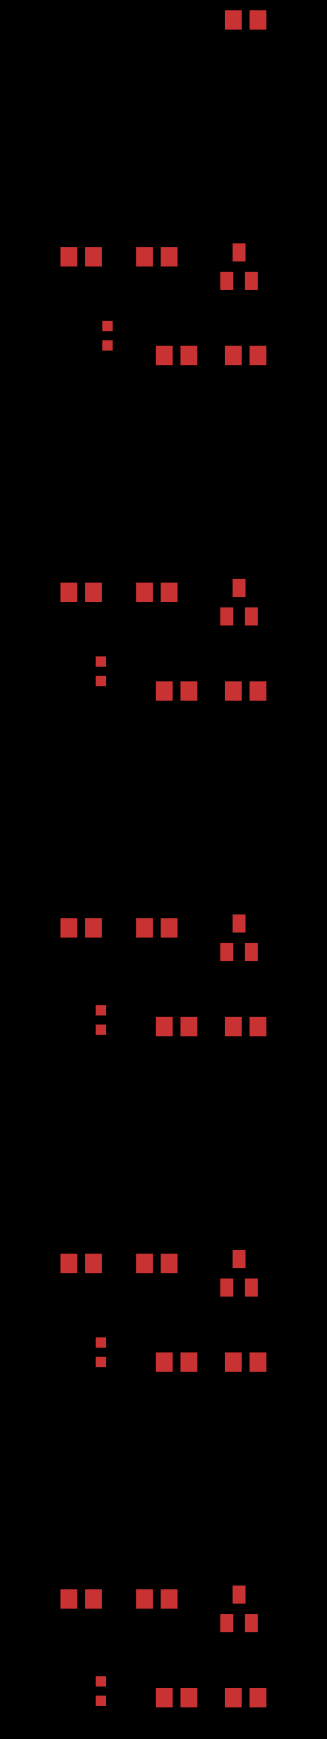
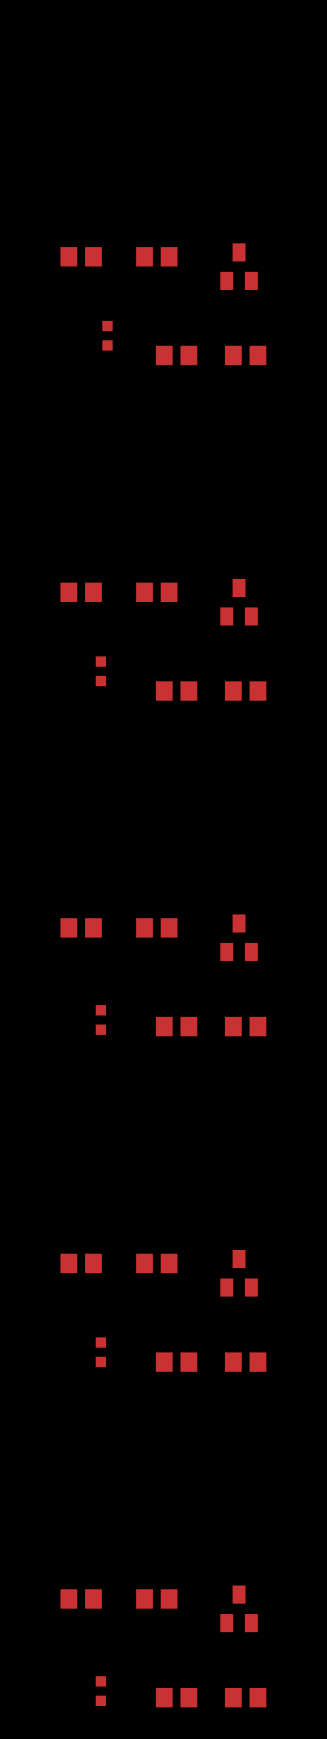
part: (245, 19) -> none

